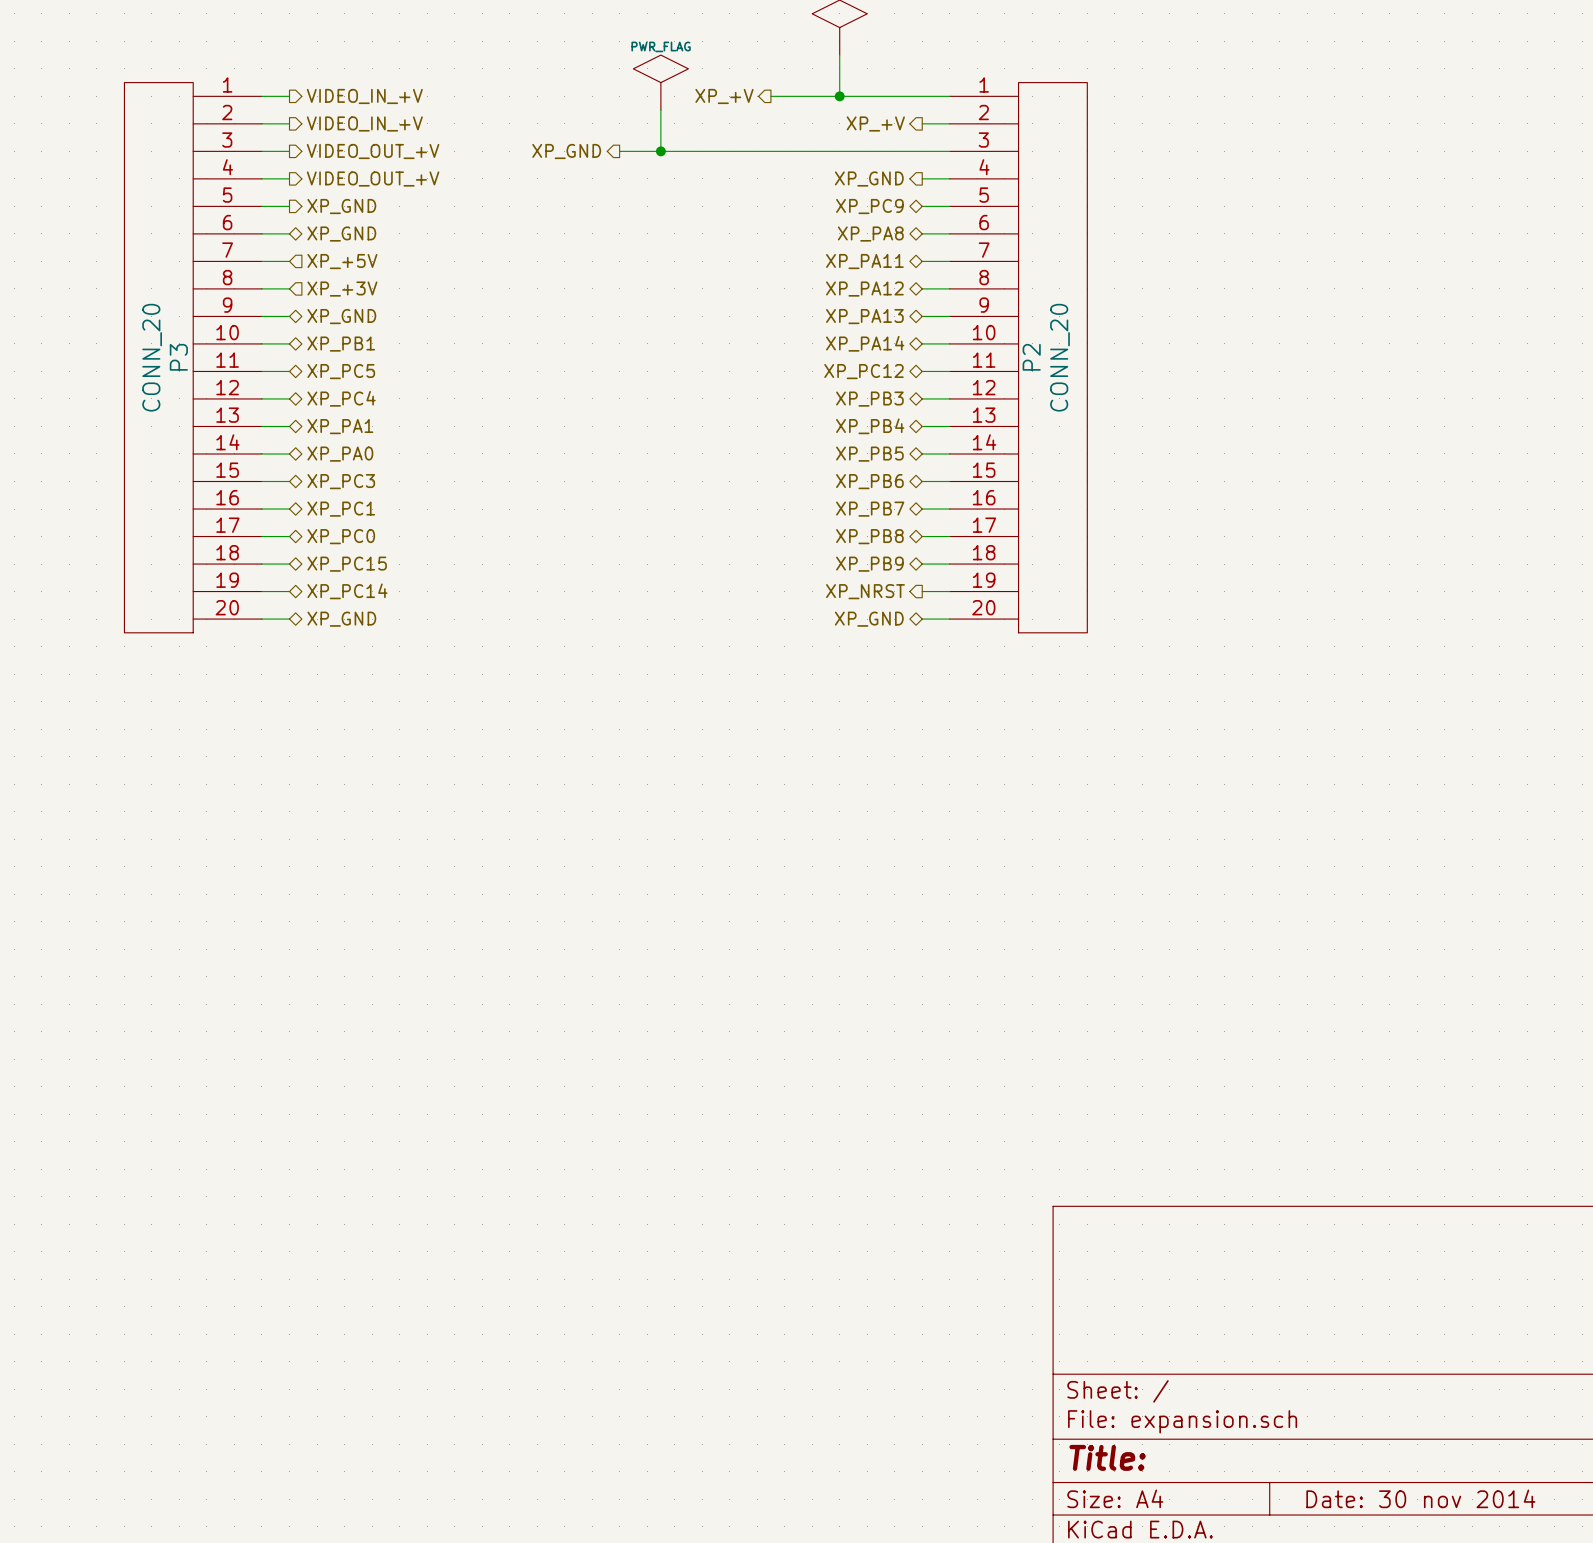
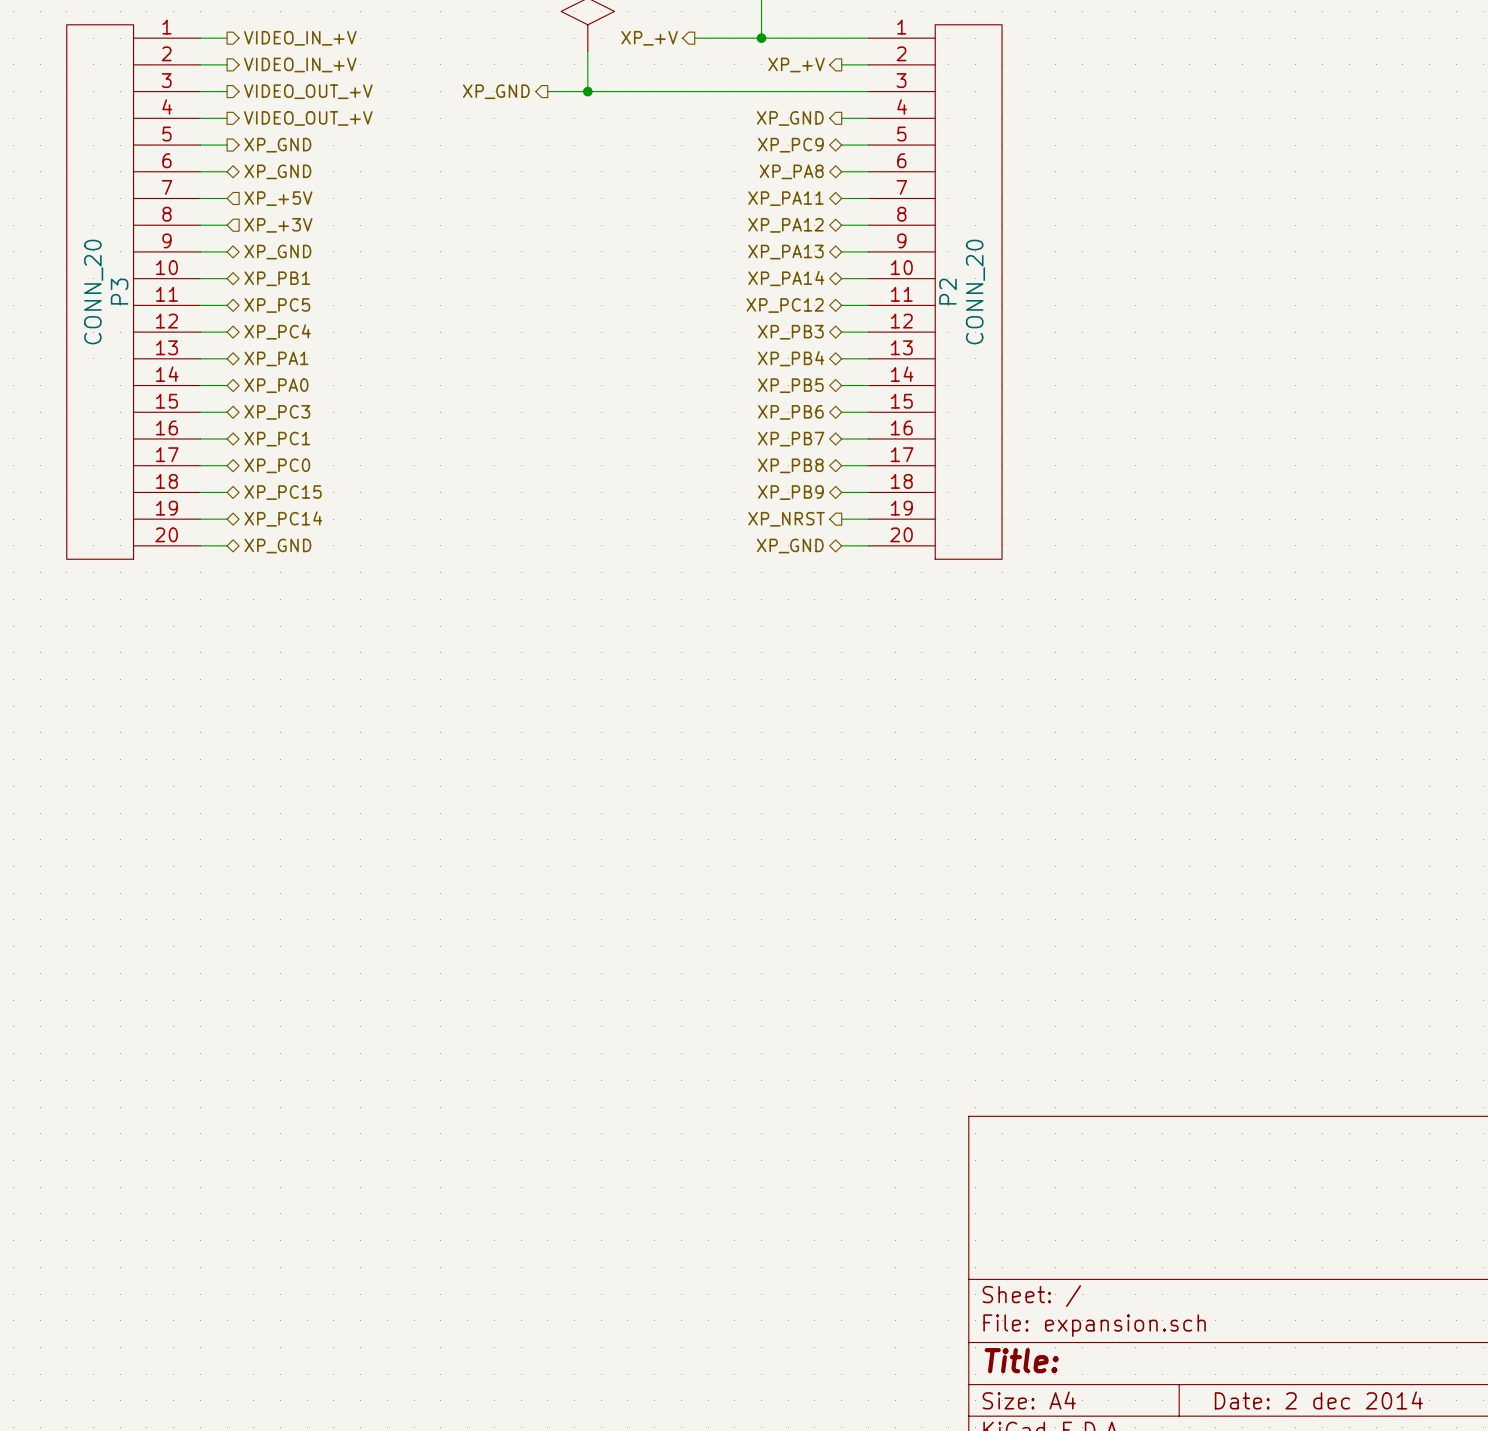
title block: Date: 30 nov 2014 (1420, 1498) -> Date: 2 dec 2014 (1318, 1400)

